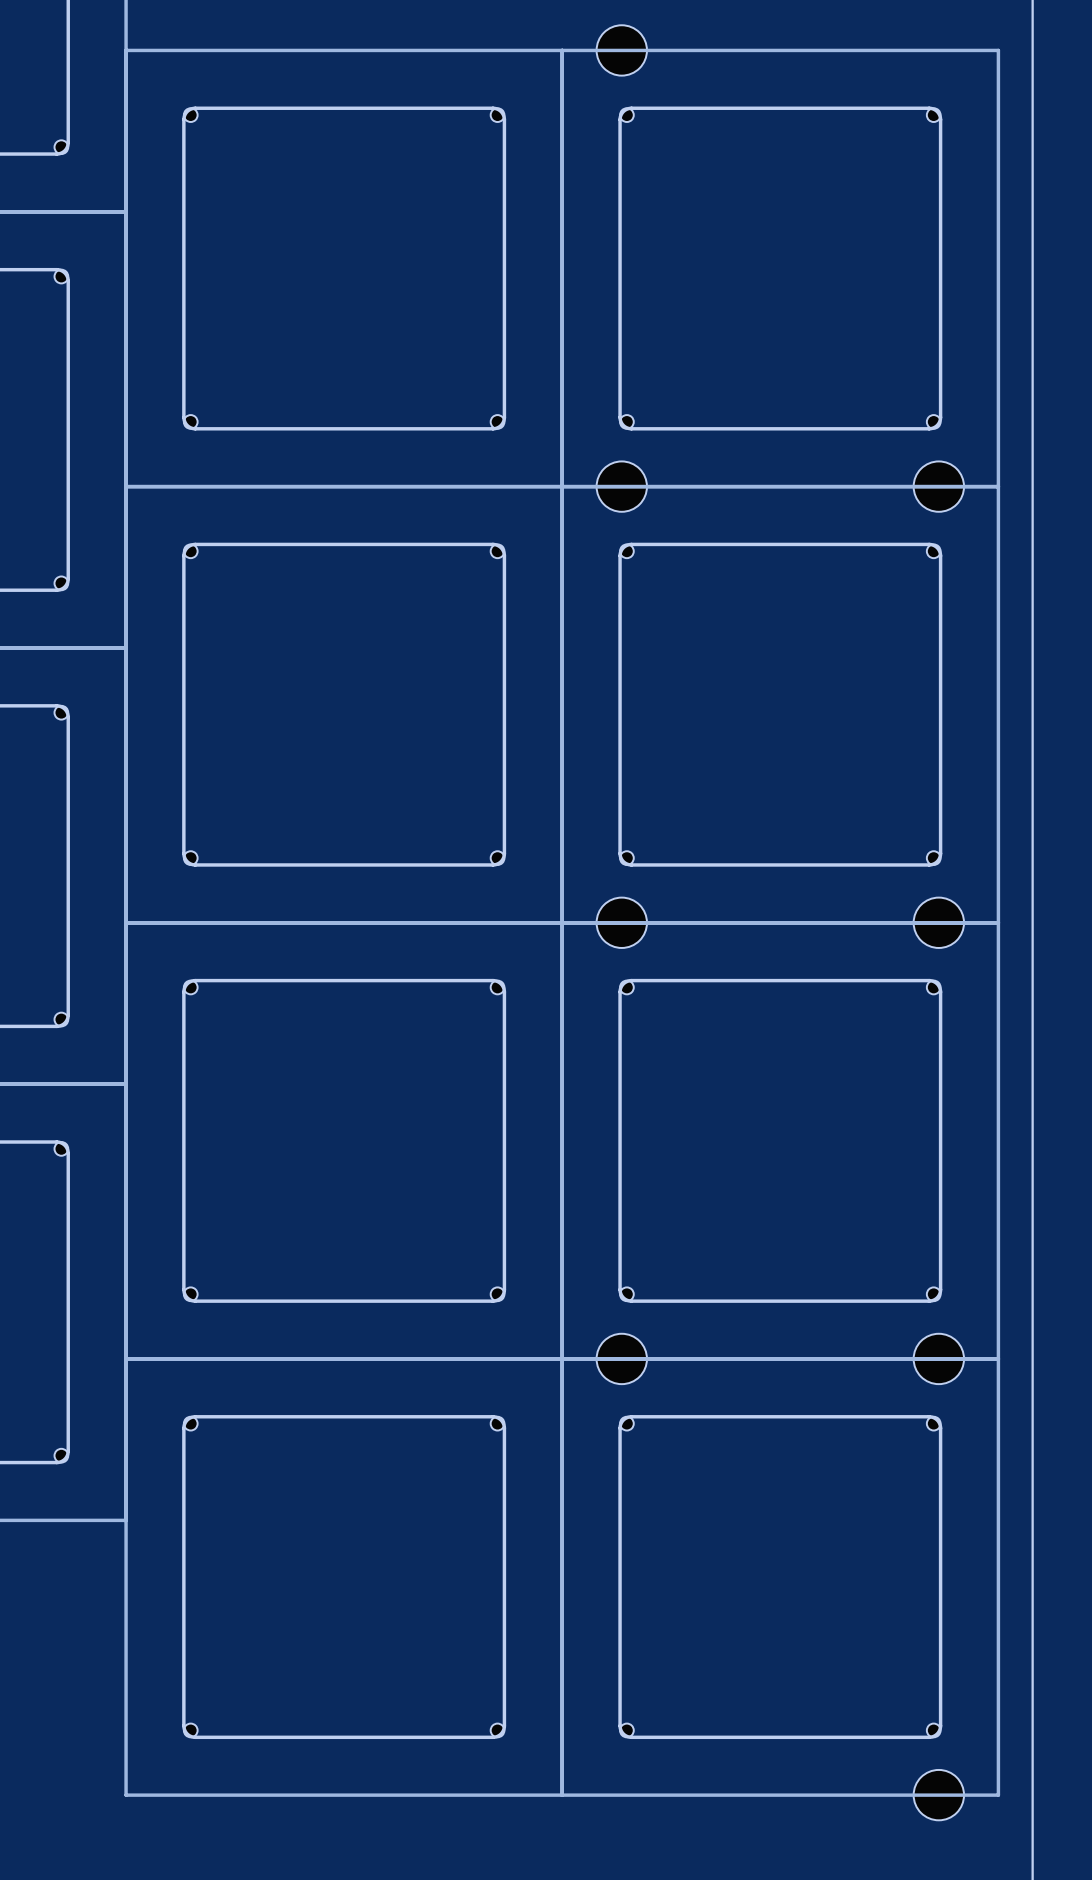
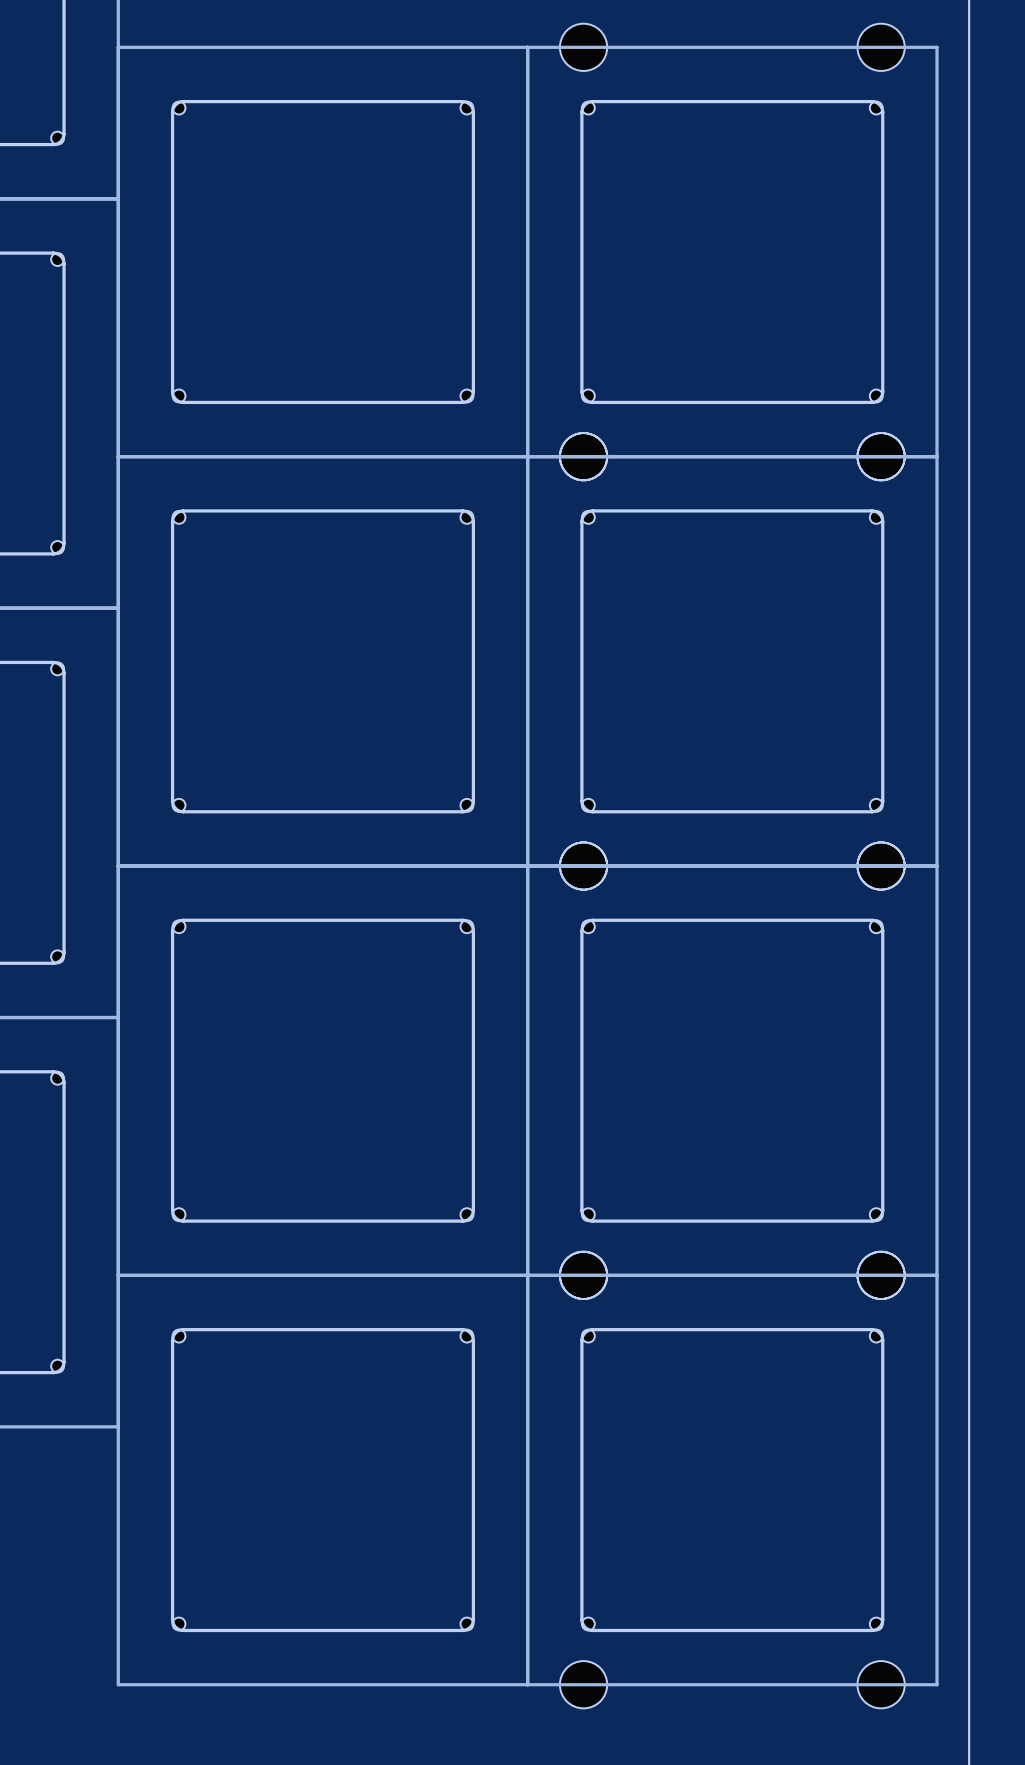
part footprint: [560, 25, 1001, 512] -> [526, 23, 939, 481]
part footprint: [560, 461, 1001, 948] -> [526, 433, 939, 890]
part footprint: [560, 897, 1001, 1385] -> [526, 842, 939, 1300]
part footprint: [560, 1333, 1001, 1821] -> [526, 1251, 939, 1709]

